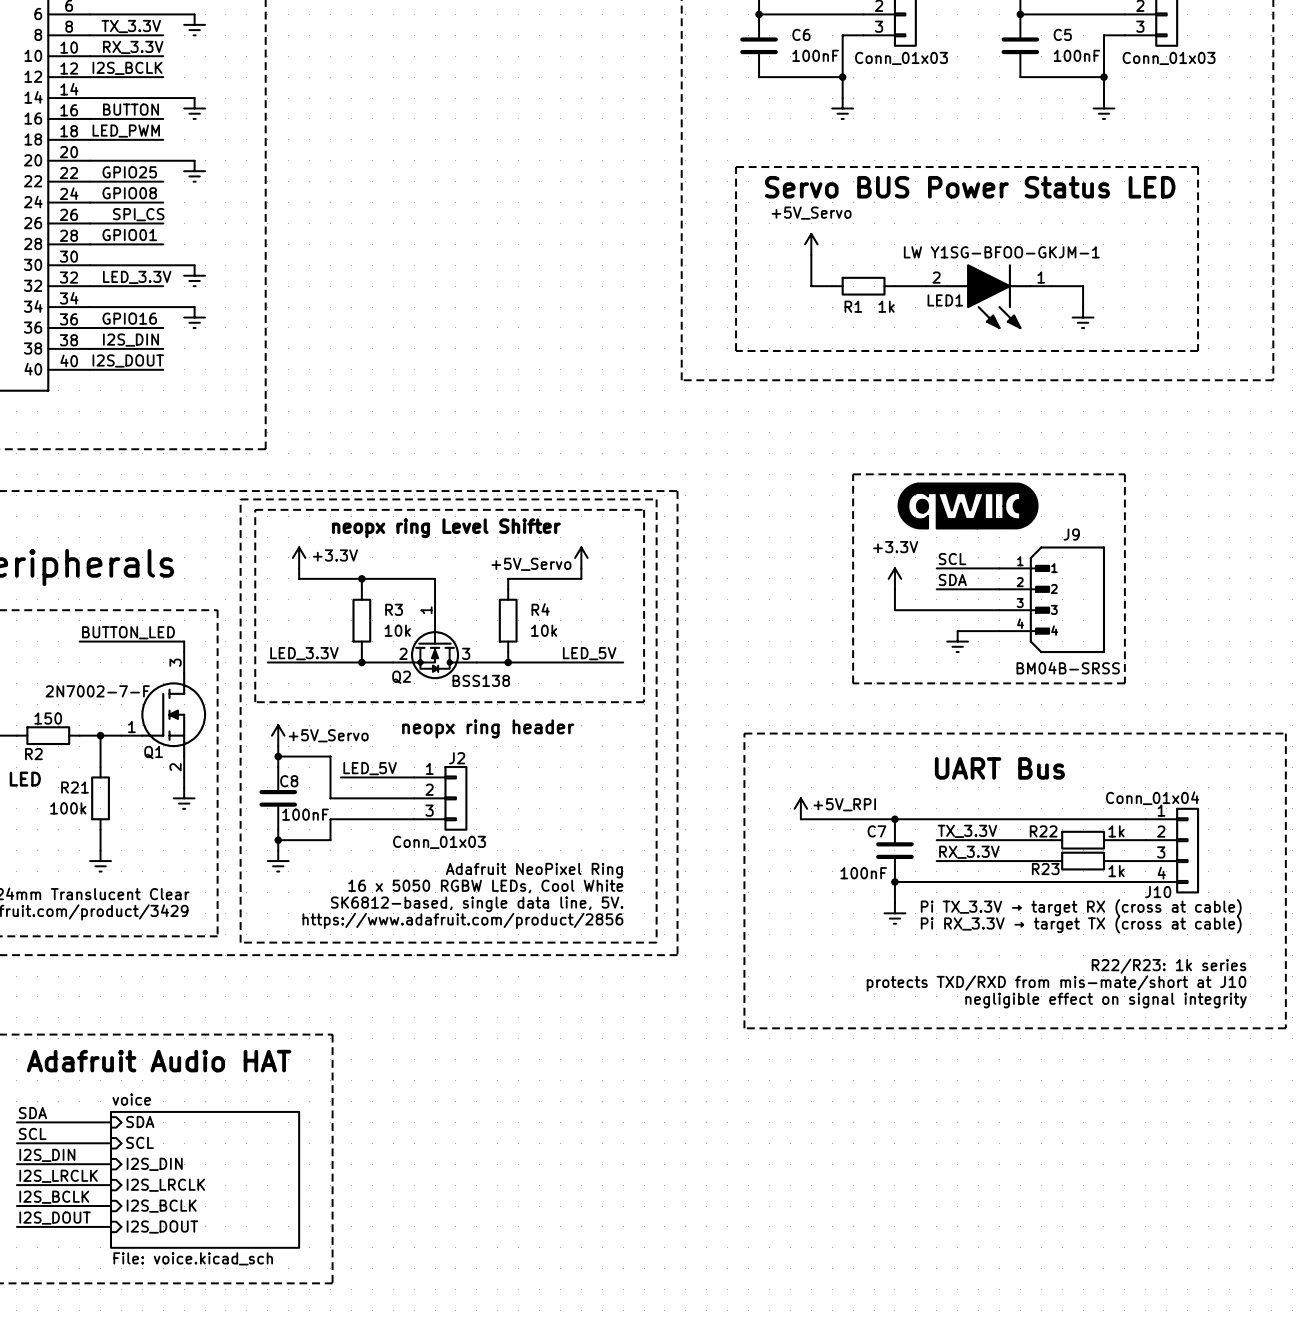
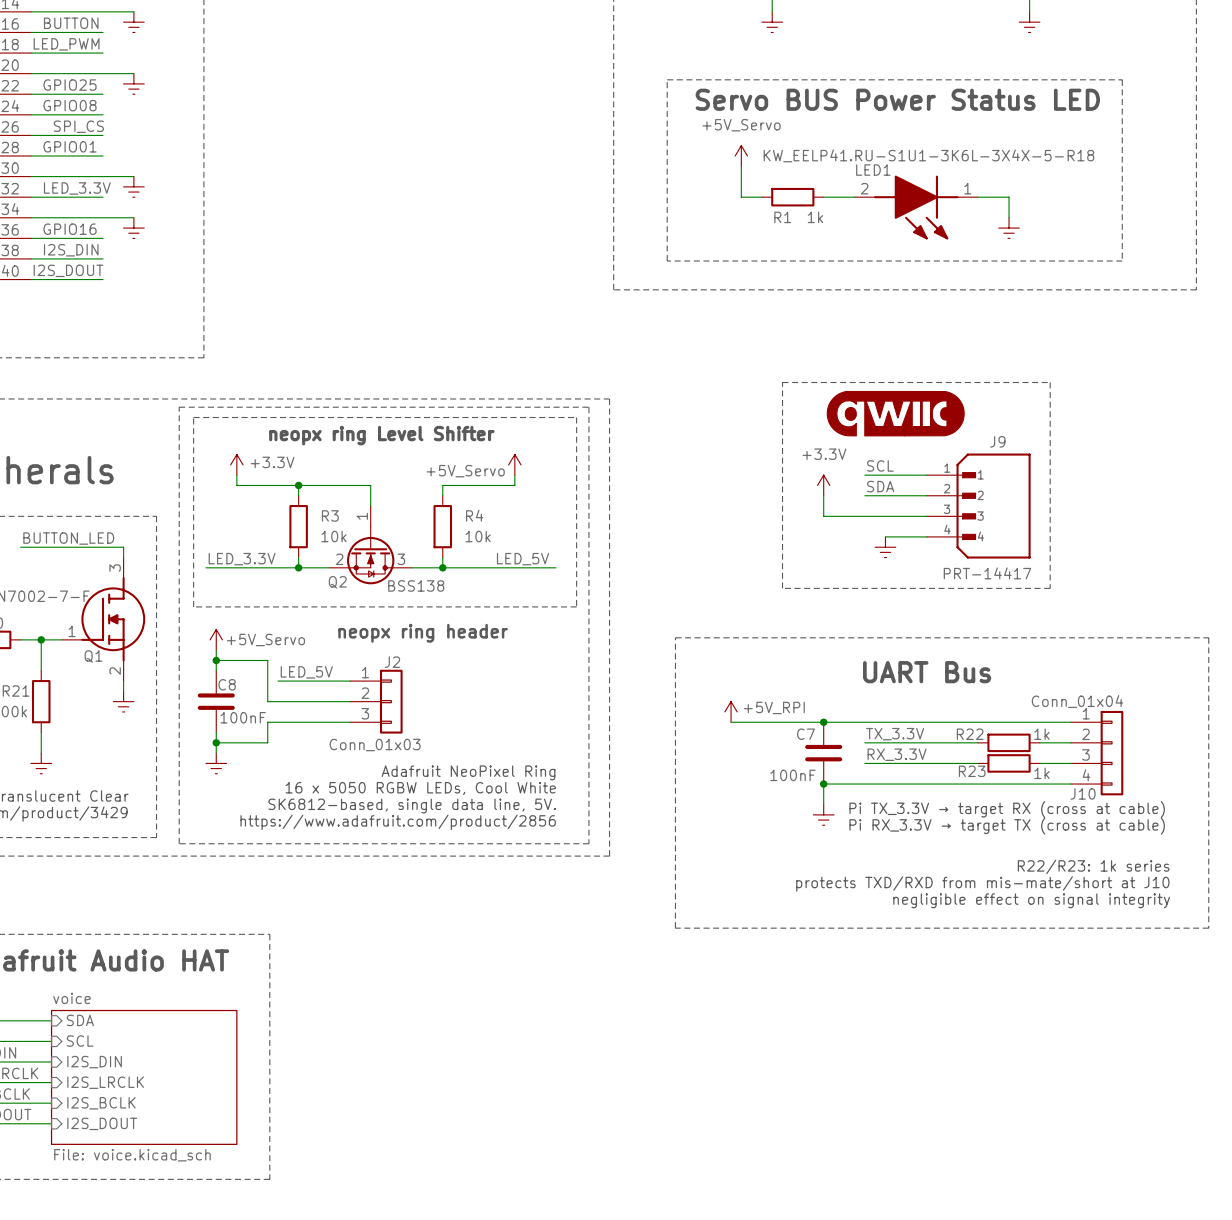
LED1 value: LW Y1SG-BFOO-GKJM-1 (1001, 252) -> KW_EELP41.RU-S1U1-3K6L-3X4X-5-R18 (928, 155)
LED1 name position: LED1 (945, 300) -> LED1 (873, 170)
J9 value: BM04B-SRSS (1068, 668) -> PRT-14417 (987, 573)

